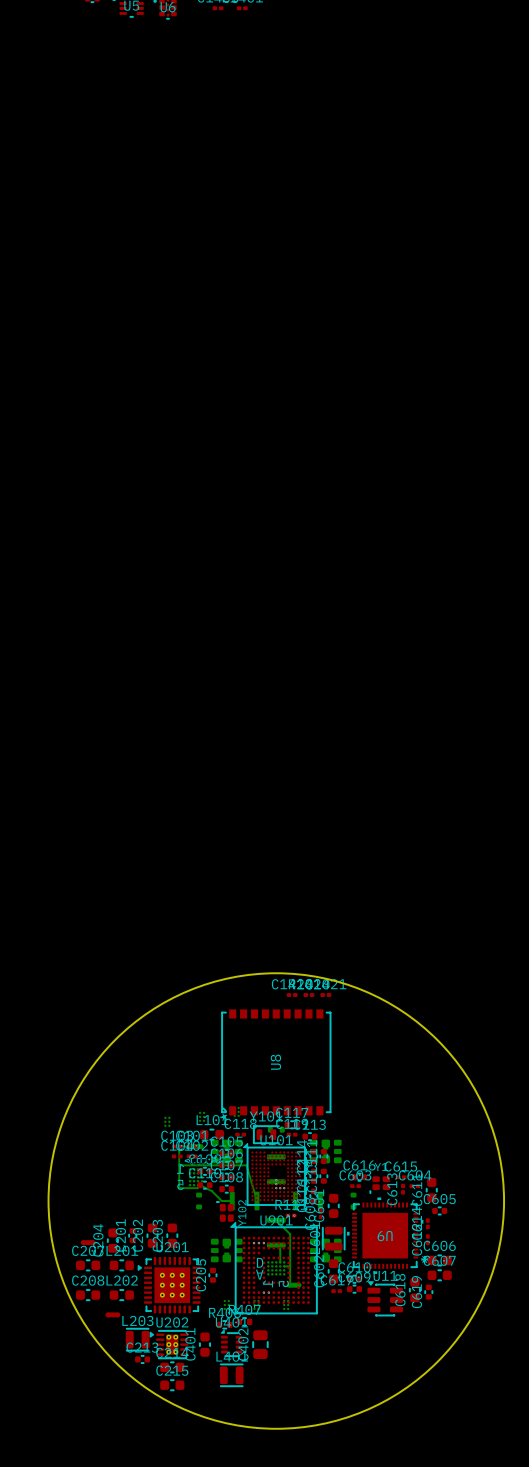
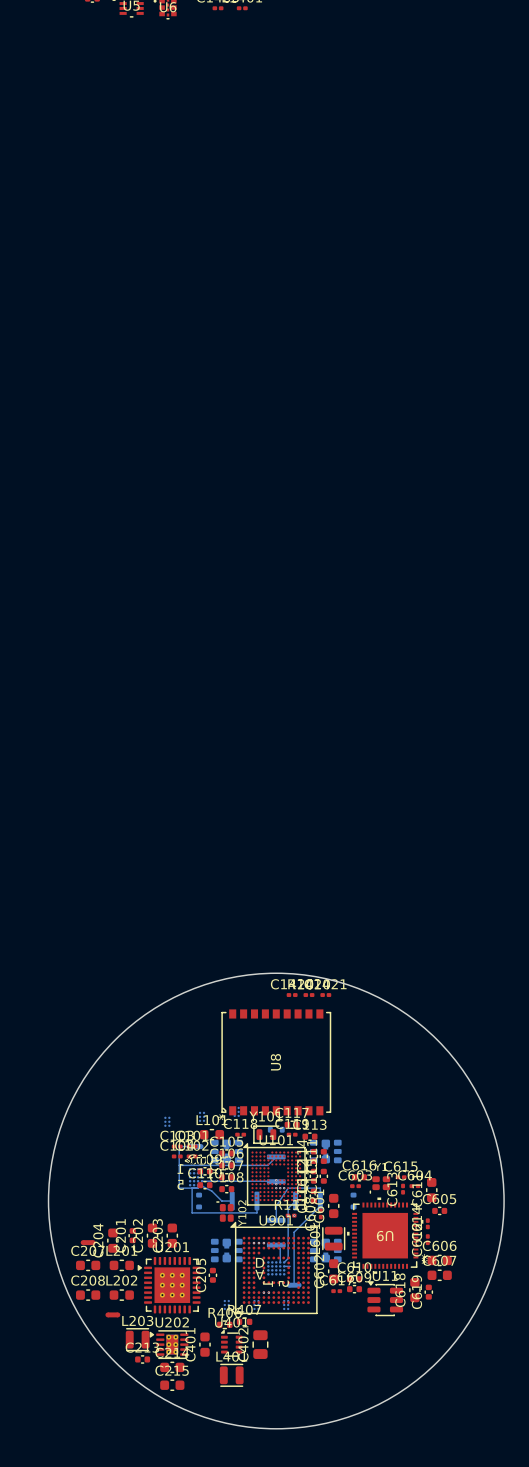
bottom track: (246, 1165) (256, 1201) -> (246, 1165) (267, 1165) (276, 1156)
bottom track: none -> (202, 1181) (276, 1181)
bottom track: none -> (192, 1188) (192, 1212) (256, 1212) (256, 1201)
bottom track: none -> (295, 1201) (288, 1208) (288, 1258) (284, 1262)
bottom track: (276, 1220) (290, 1234) (290, 1285) -> (276, 1220) (276, 1205) (288, 1188) (320, 1188) (320, 1205) (294, 1232) (294, 1285) (290, 1285)

